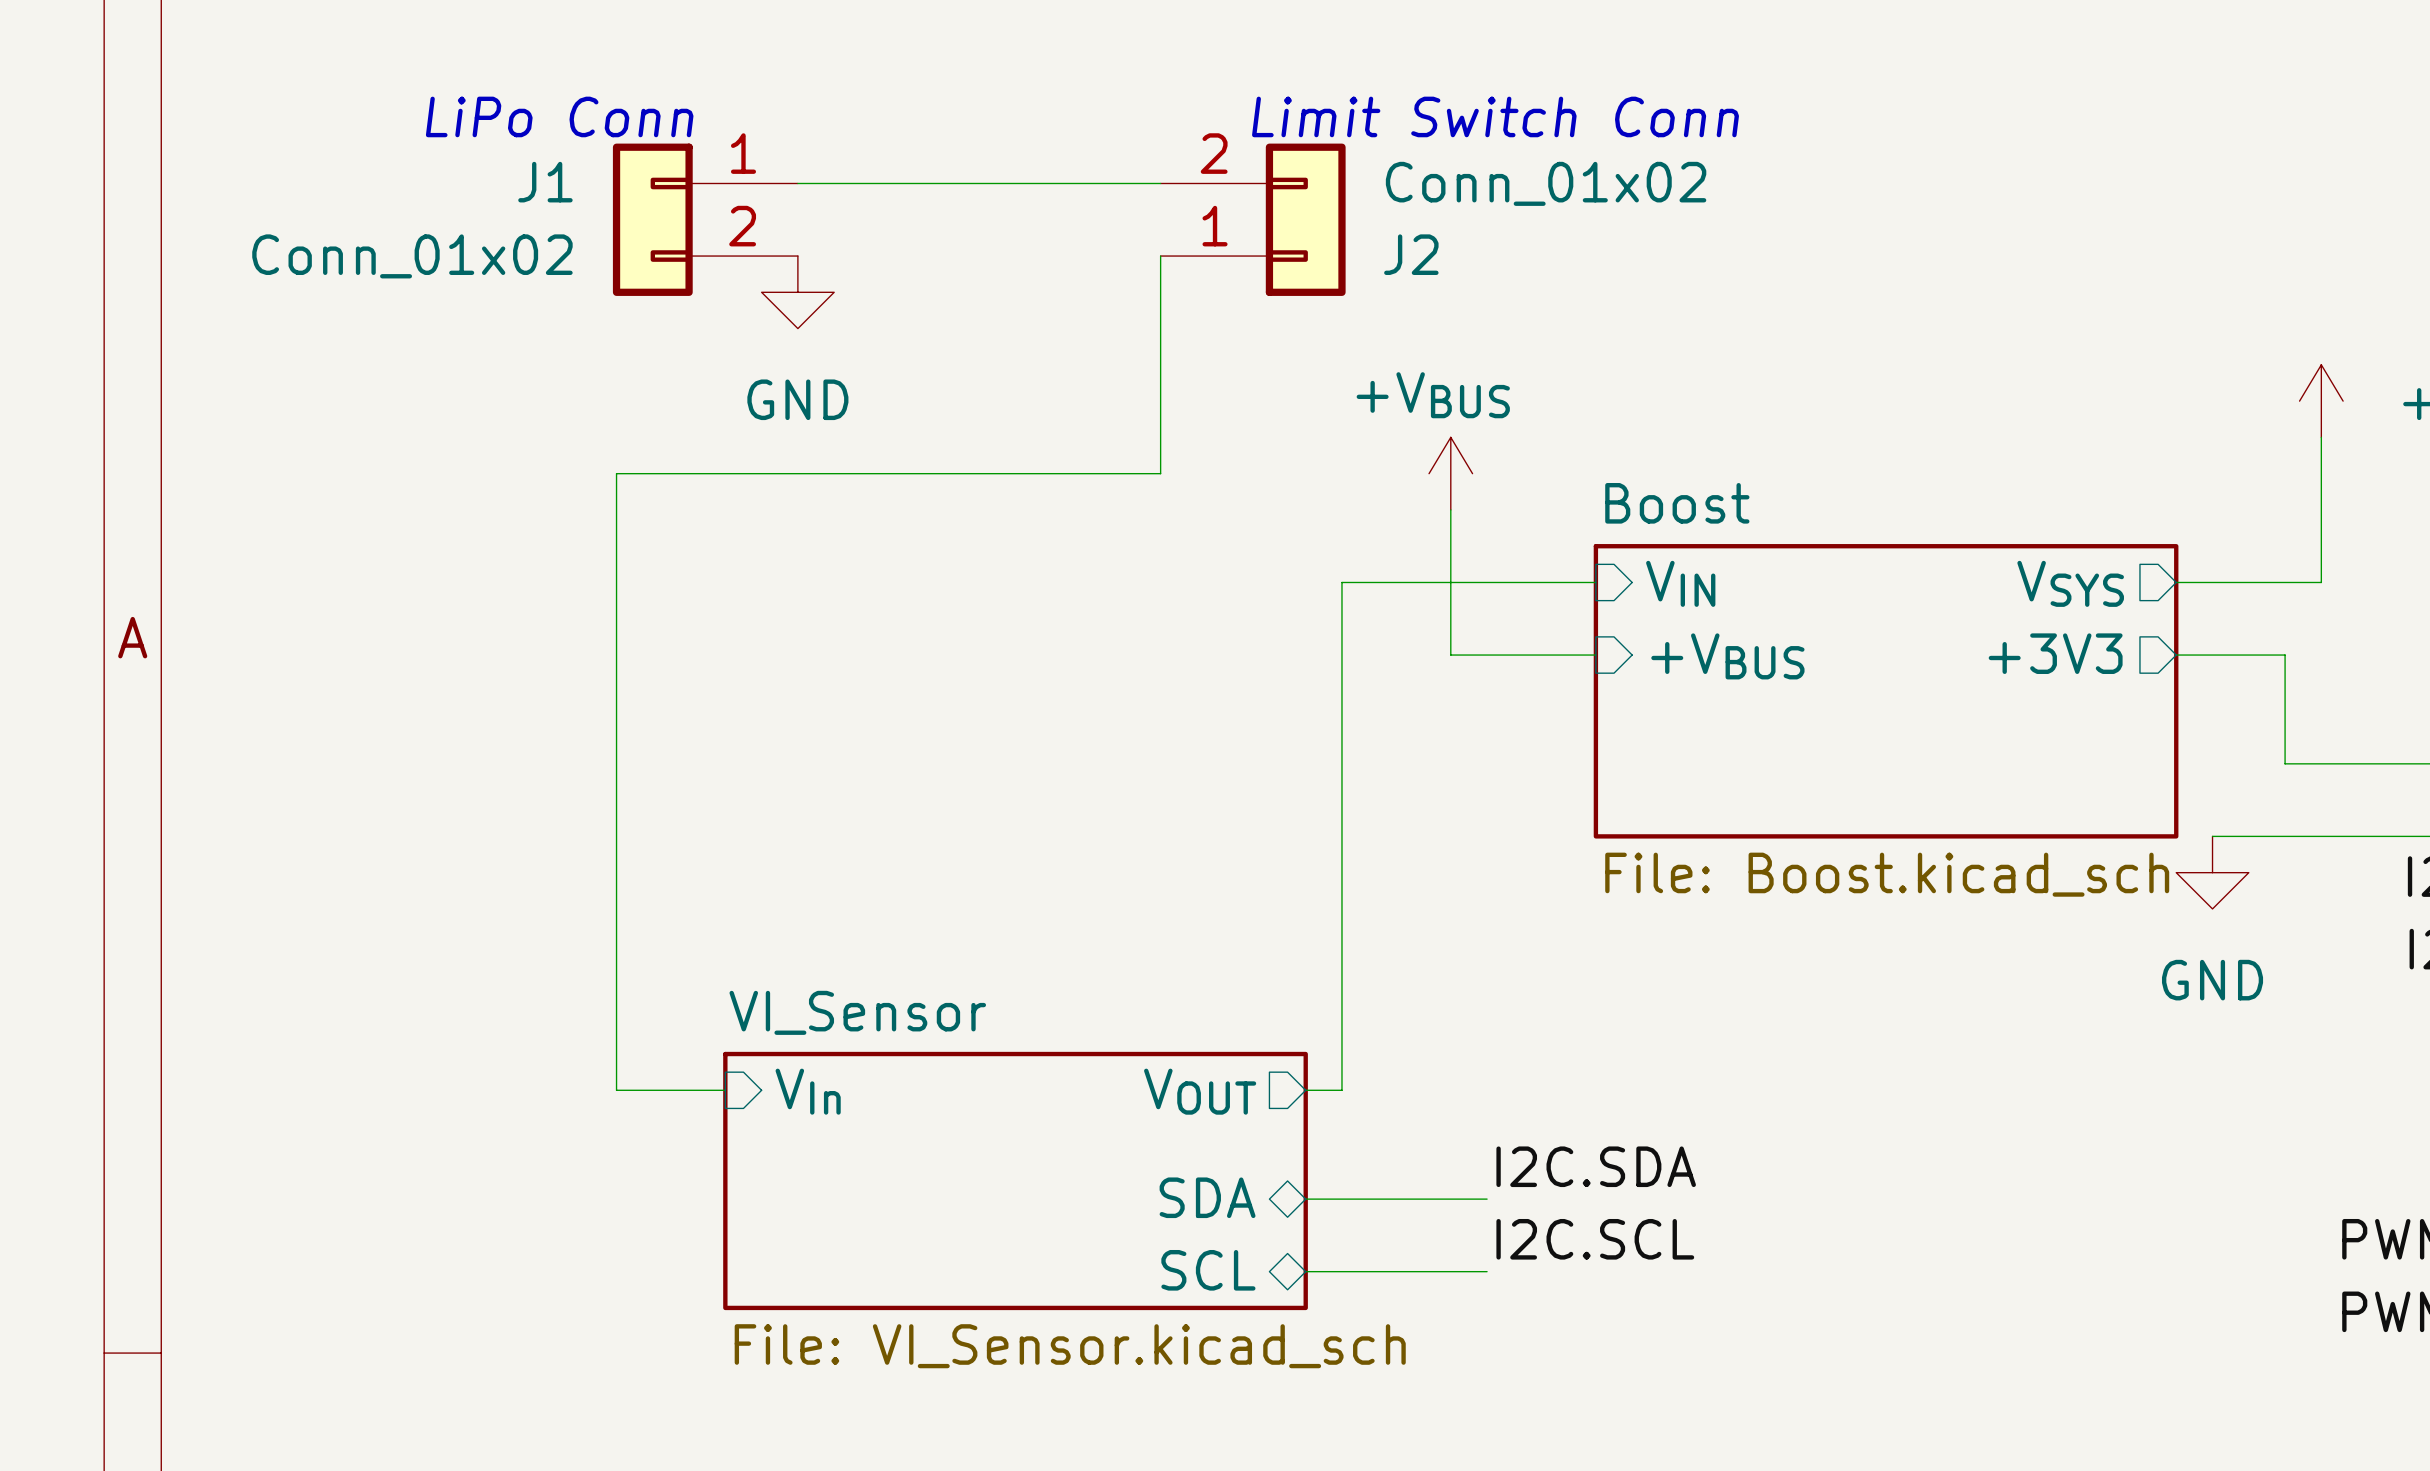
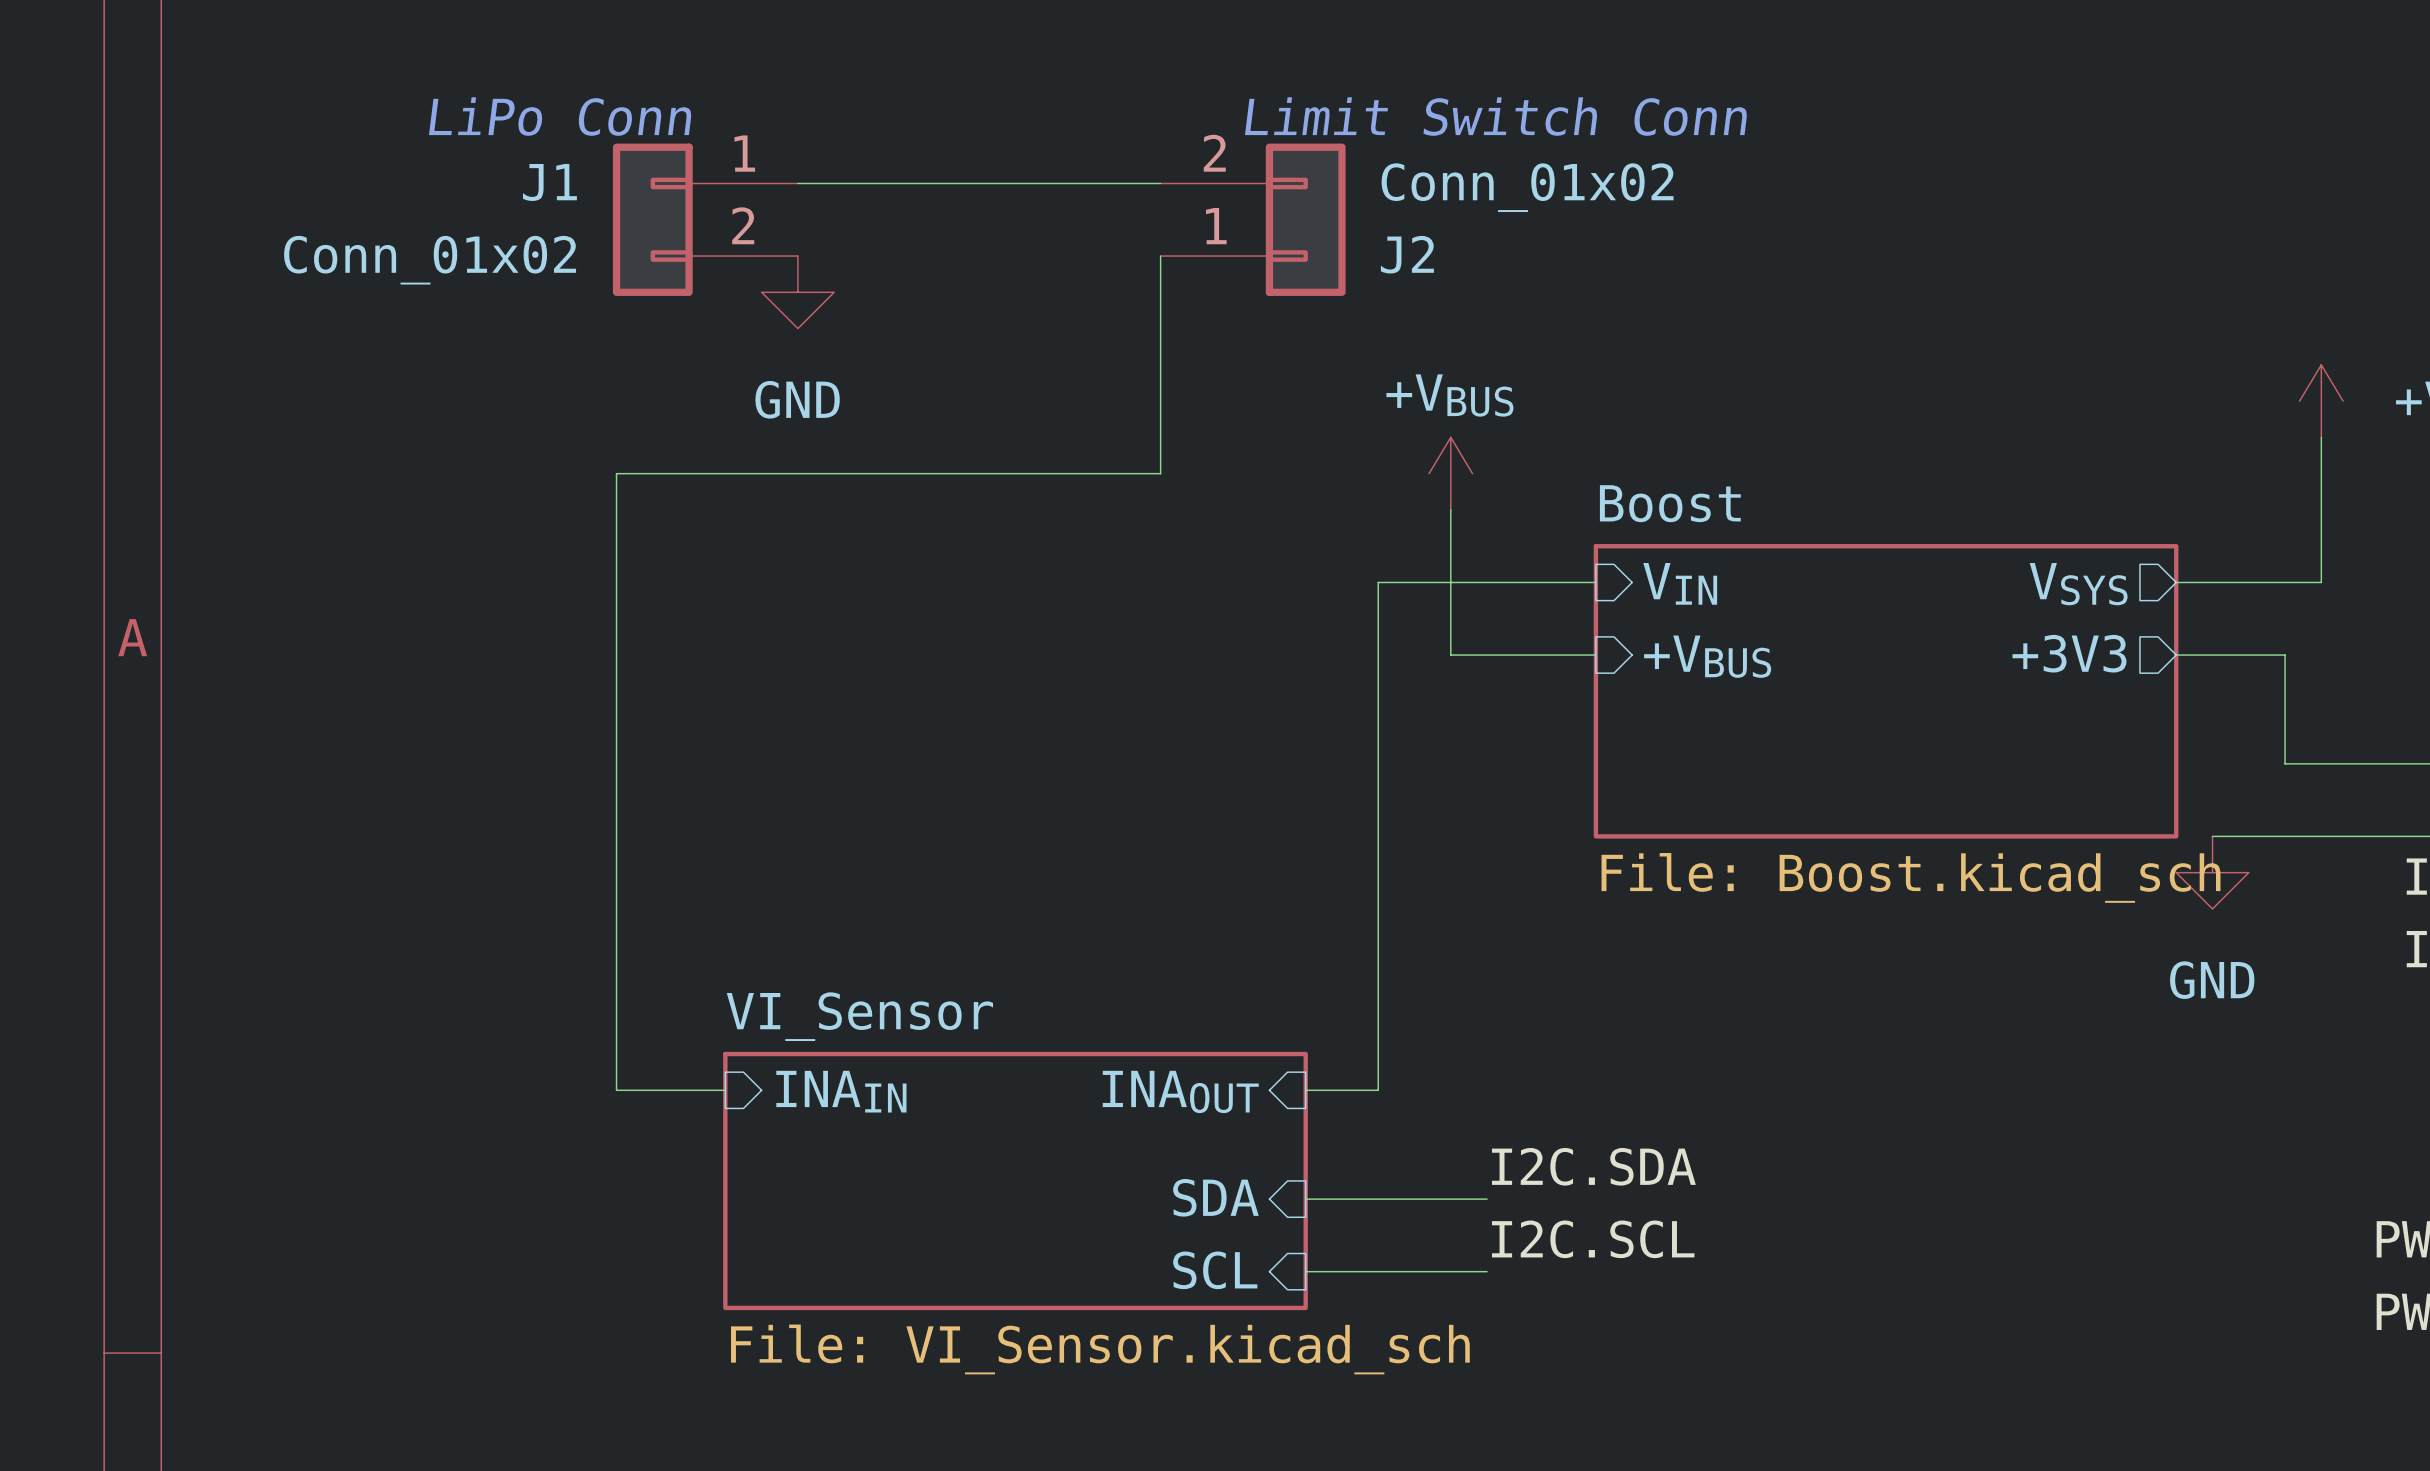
wire: (1378, 582) (1341, 582) (1341, 1090) -> (1378, 582) (1378, 1090) (1341, 1090)
sheet pin: VIn (808, 1091) -> INAIN (841, 1091)
sheet pin shape: output (1200, 1091) -> input (1180, 1091)
sheet pin: VOUT (1200, 1091) -> INAOUT (1180, 1091)
sheet pin shape: bidirectional (1207, 1197) -> input (1215, 1197)
sheet pin shape: bidirectional (1208, 1270) -> input (1215, 1270)

